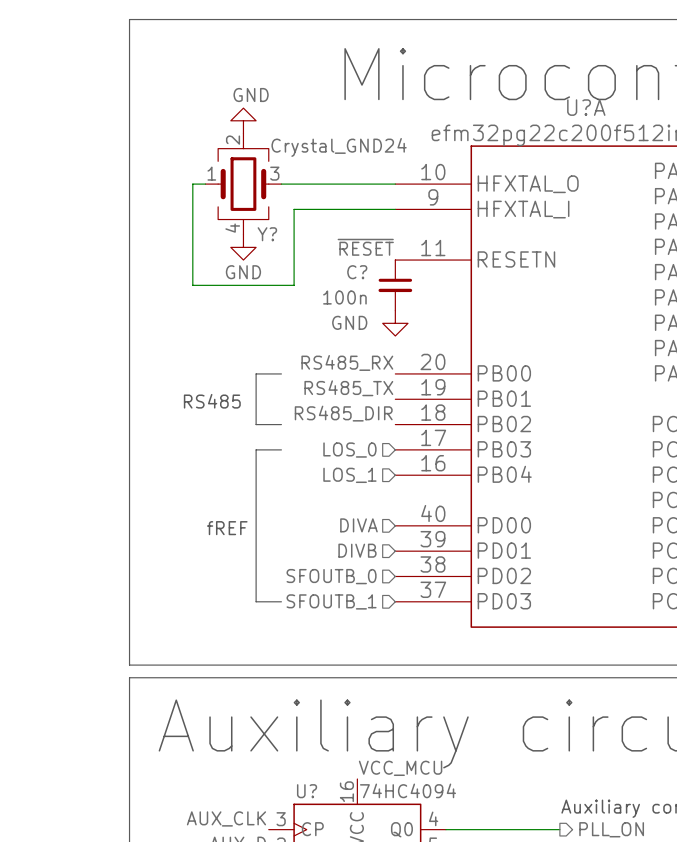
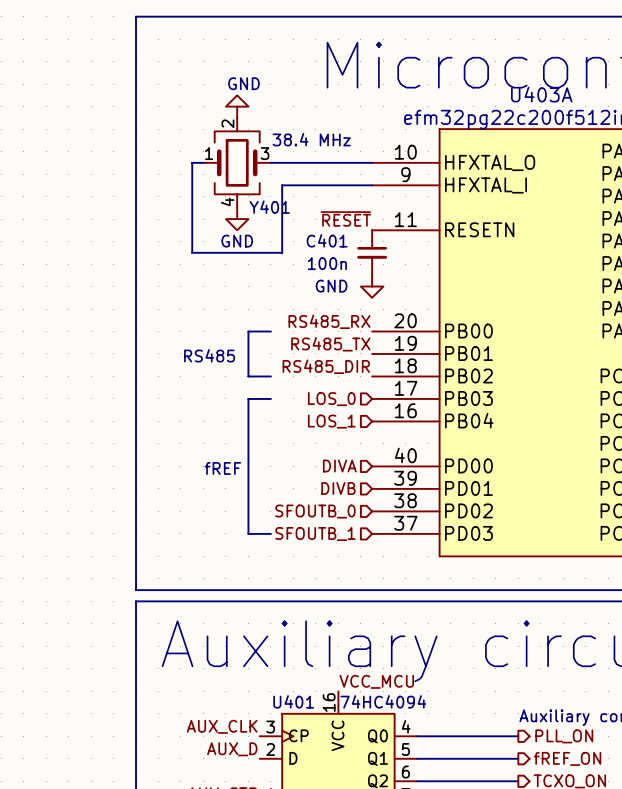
U?A name: U?A (586, 107) -> U403A (541, 94)
Y? value: Crystal_GND24 (339, 147) -> 38.4 MHz (311, 139)
Y? name: Y? (267, 234) -> Y401 (269, 207)
C? name: C? (357, 272) -> C401 (327, 240)
U? name: U? (307, 791) -> U401 (293, 701)

